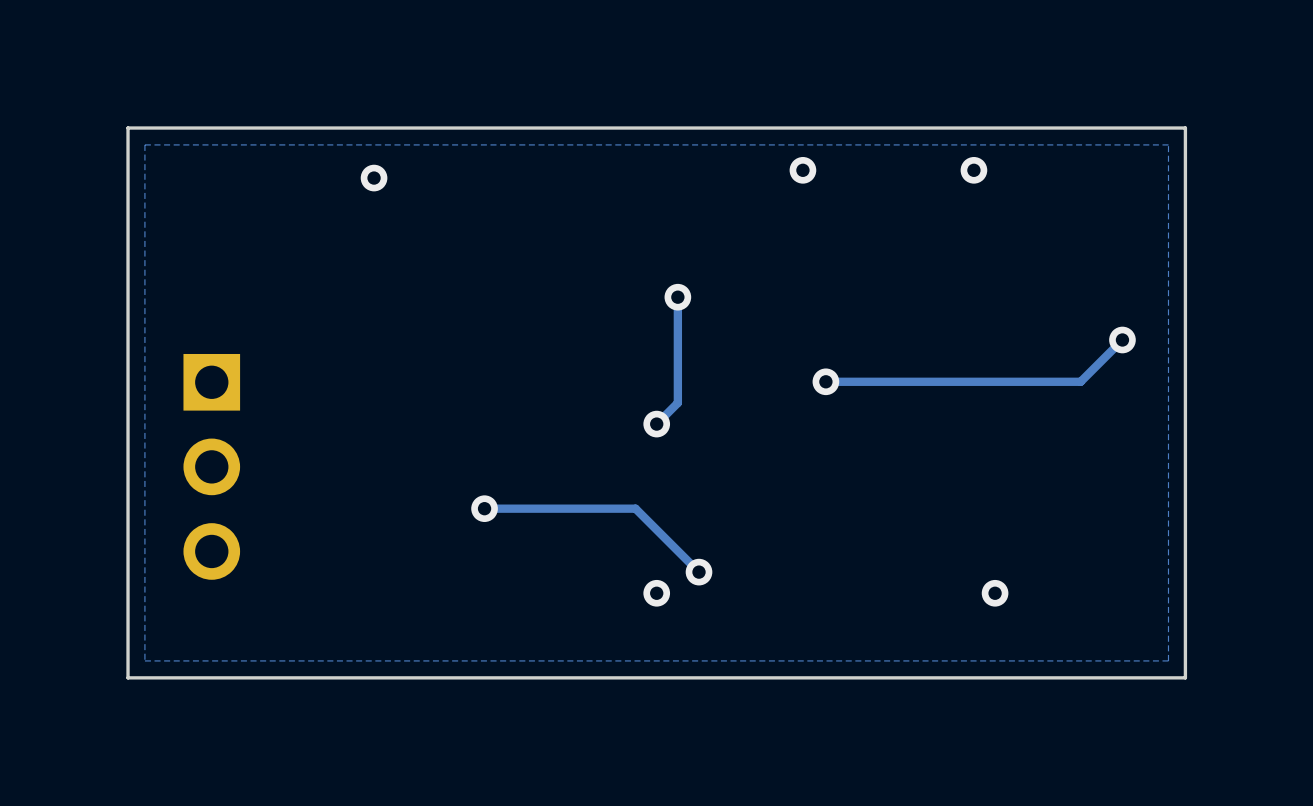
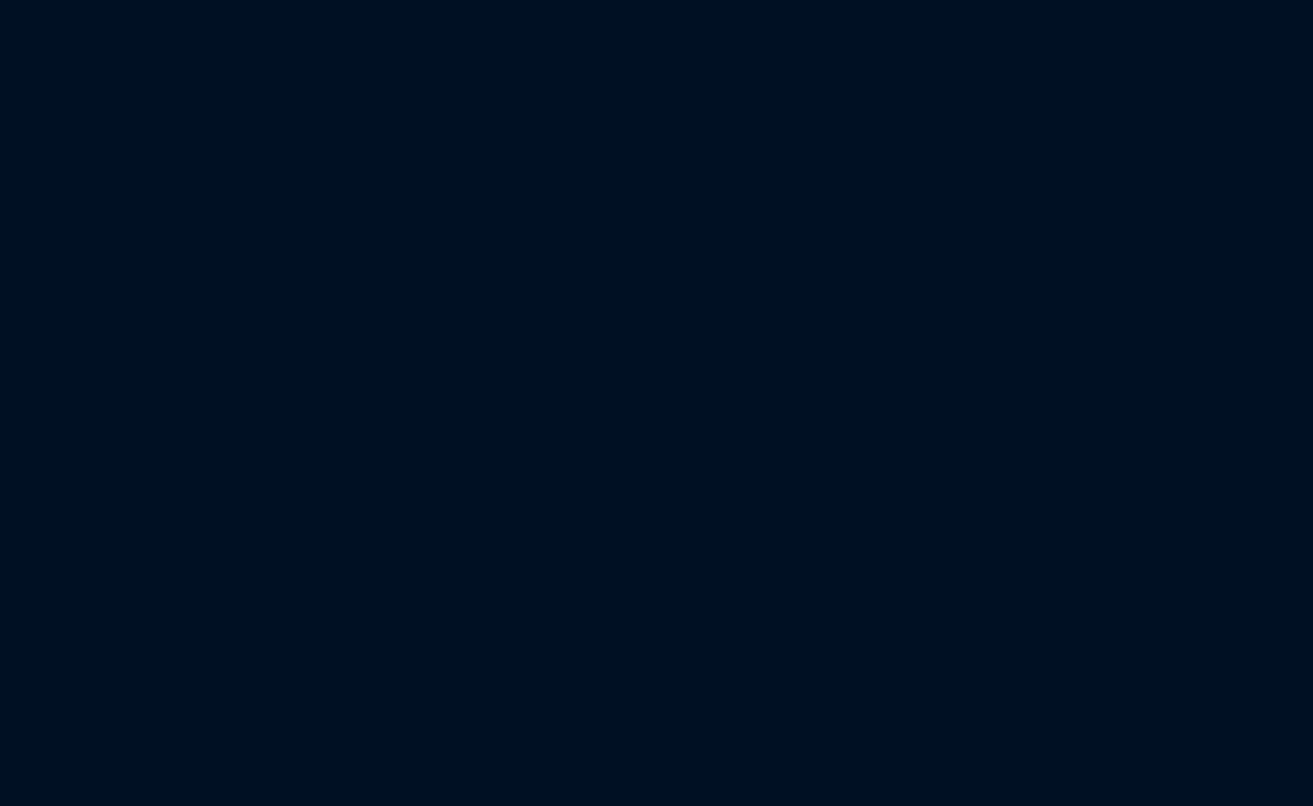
board edge: (1185, 128) (128, 128) (128, 677) (1185, 677) (1185, 128) -> none
zone outline: (1168, 144) (1168, 660) (144, 660) (144, 144) (1168, 144) -> none
via: (802, 170) -> none
via: (973, 170) -> none
via: (374, 178) -> none
track: (677, 297) (677, 402) (656, 424) -> none
via: (677, 297) -> none
track: (1122, 339) (1080, 381) (825, 381) -> none
via: (1122, 339) -> none
via: (825, 381) -> none
via: (656, 424) -> none
part: (211, 466) -> none
track: (484, 508) (635, 508) (699, 572) -> none
via: (484, 508) -> none
via: (699, 572) -> none
via: (656, 593) -> none
via: (995, 593) -> none

